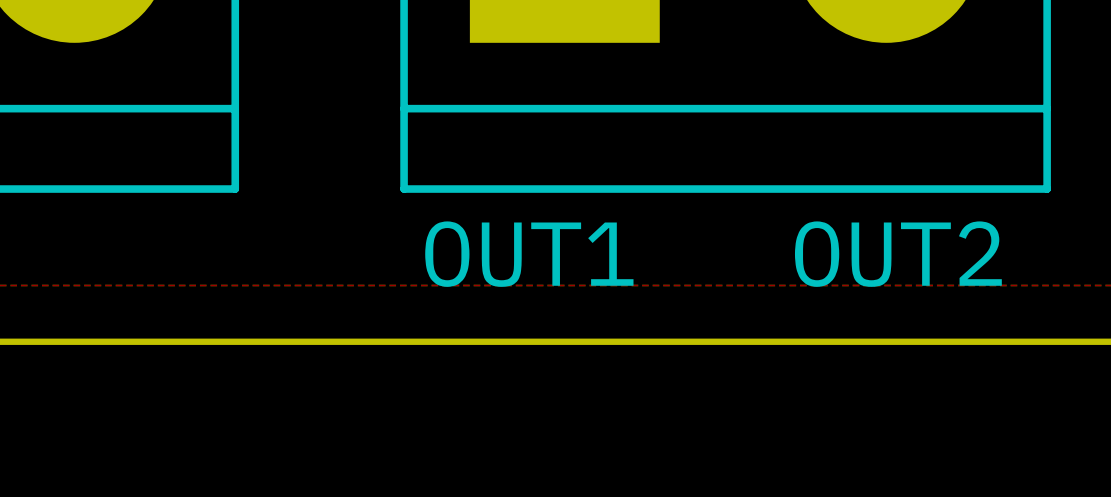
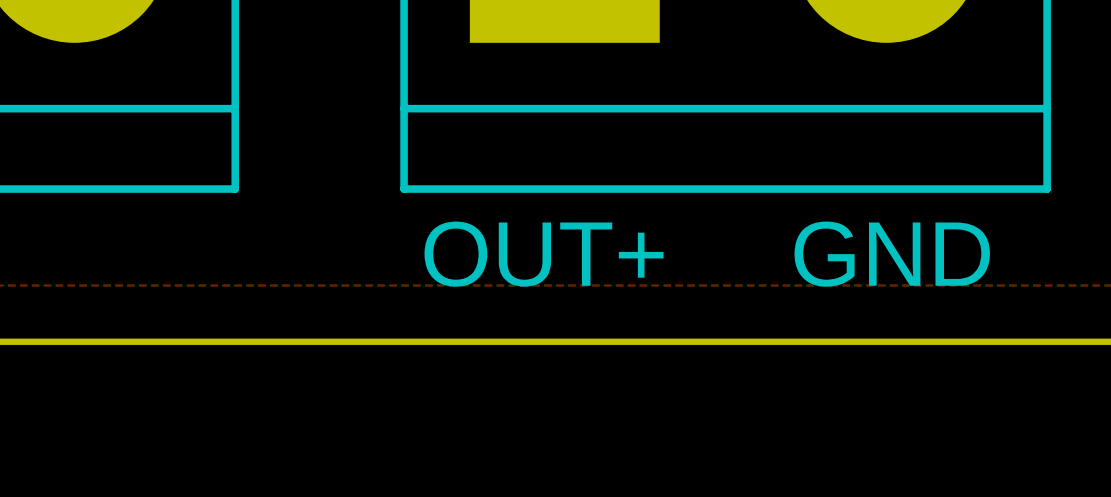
text: OUT1 (529, 254) -> OUT+ (544, 254)
text: OUT2 (898, 254) -> GND (892, 254)

